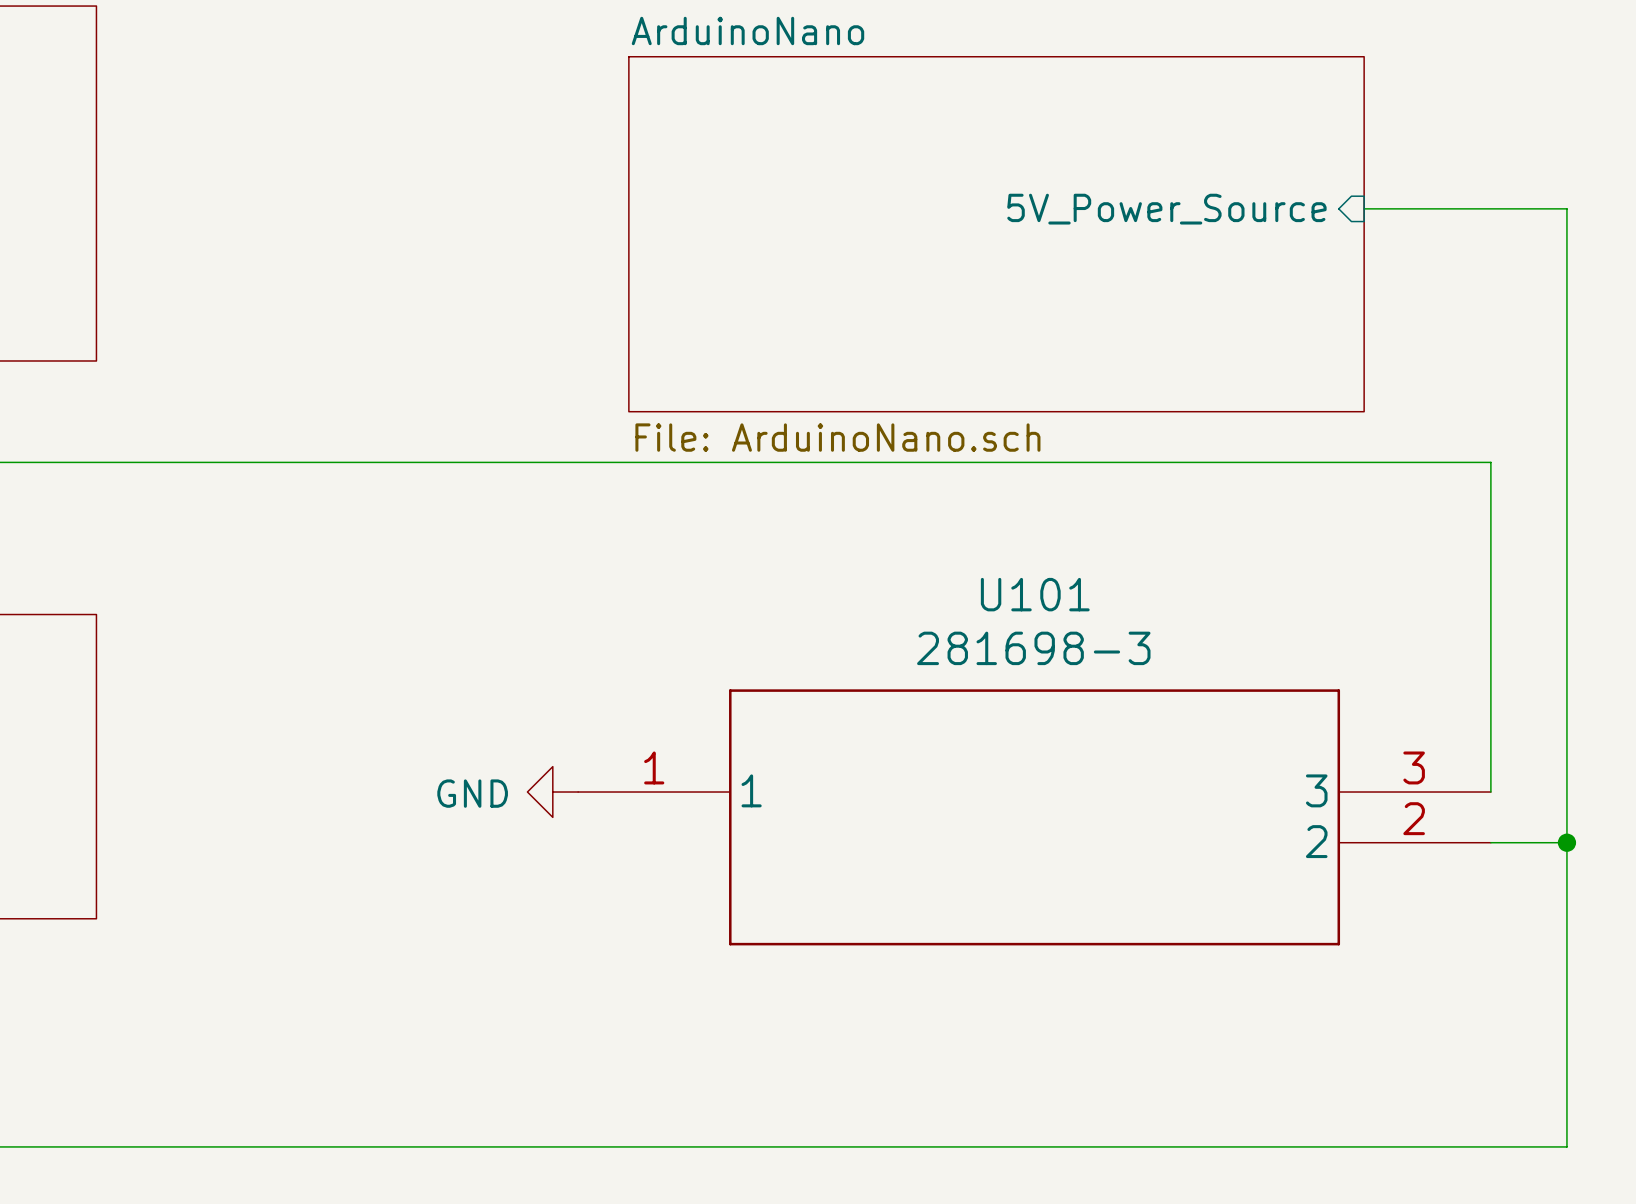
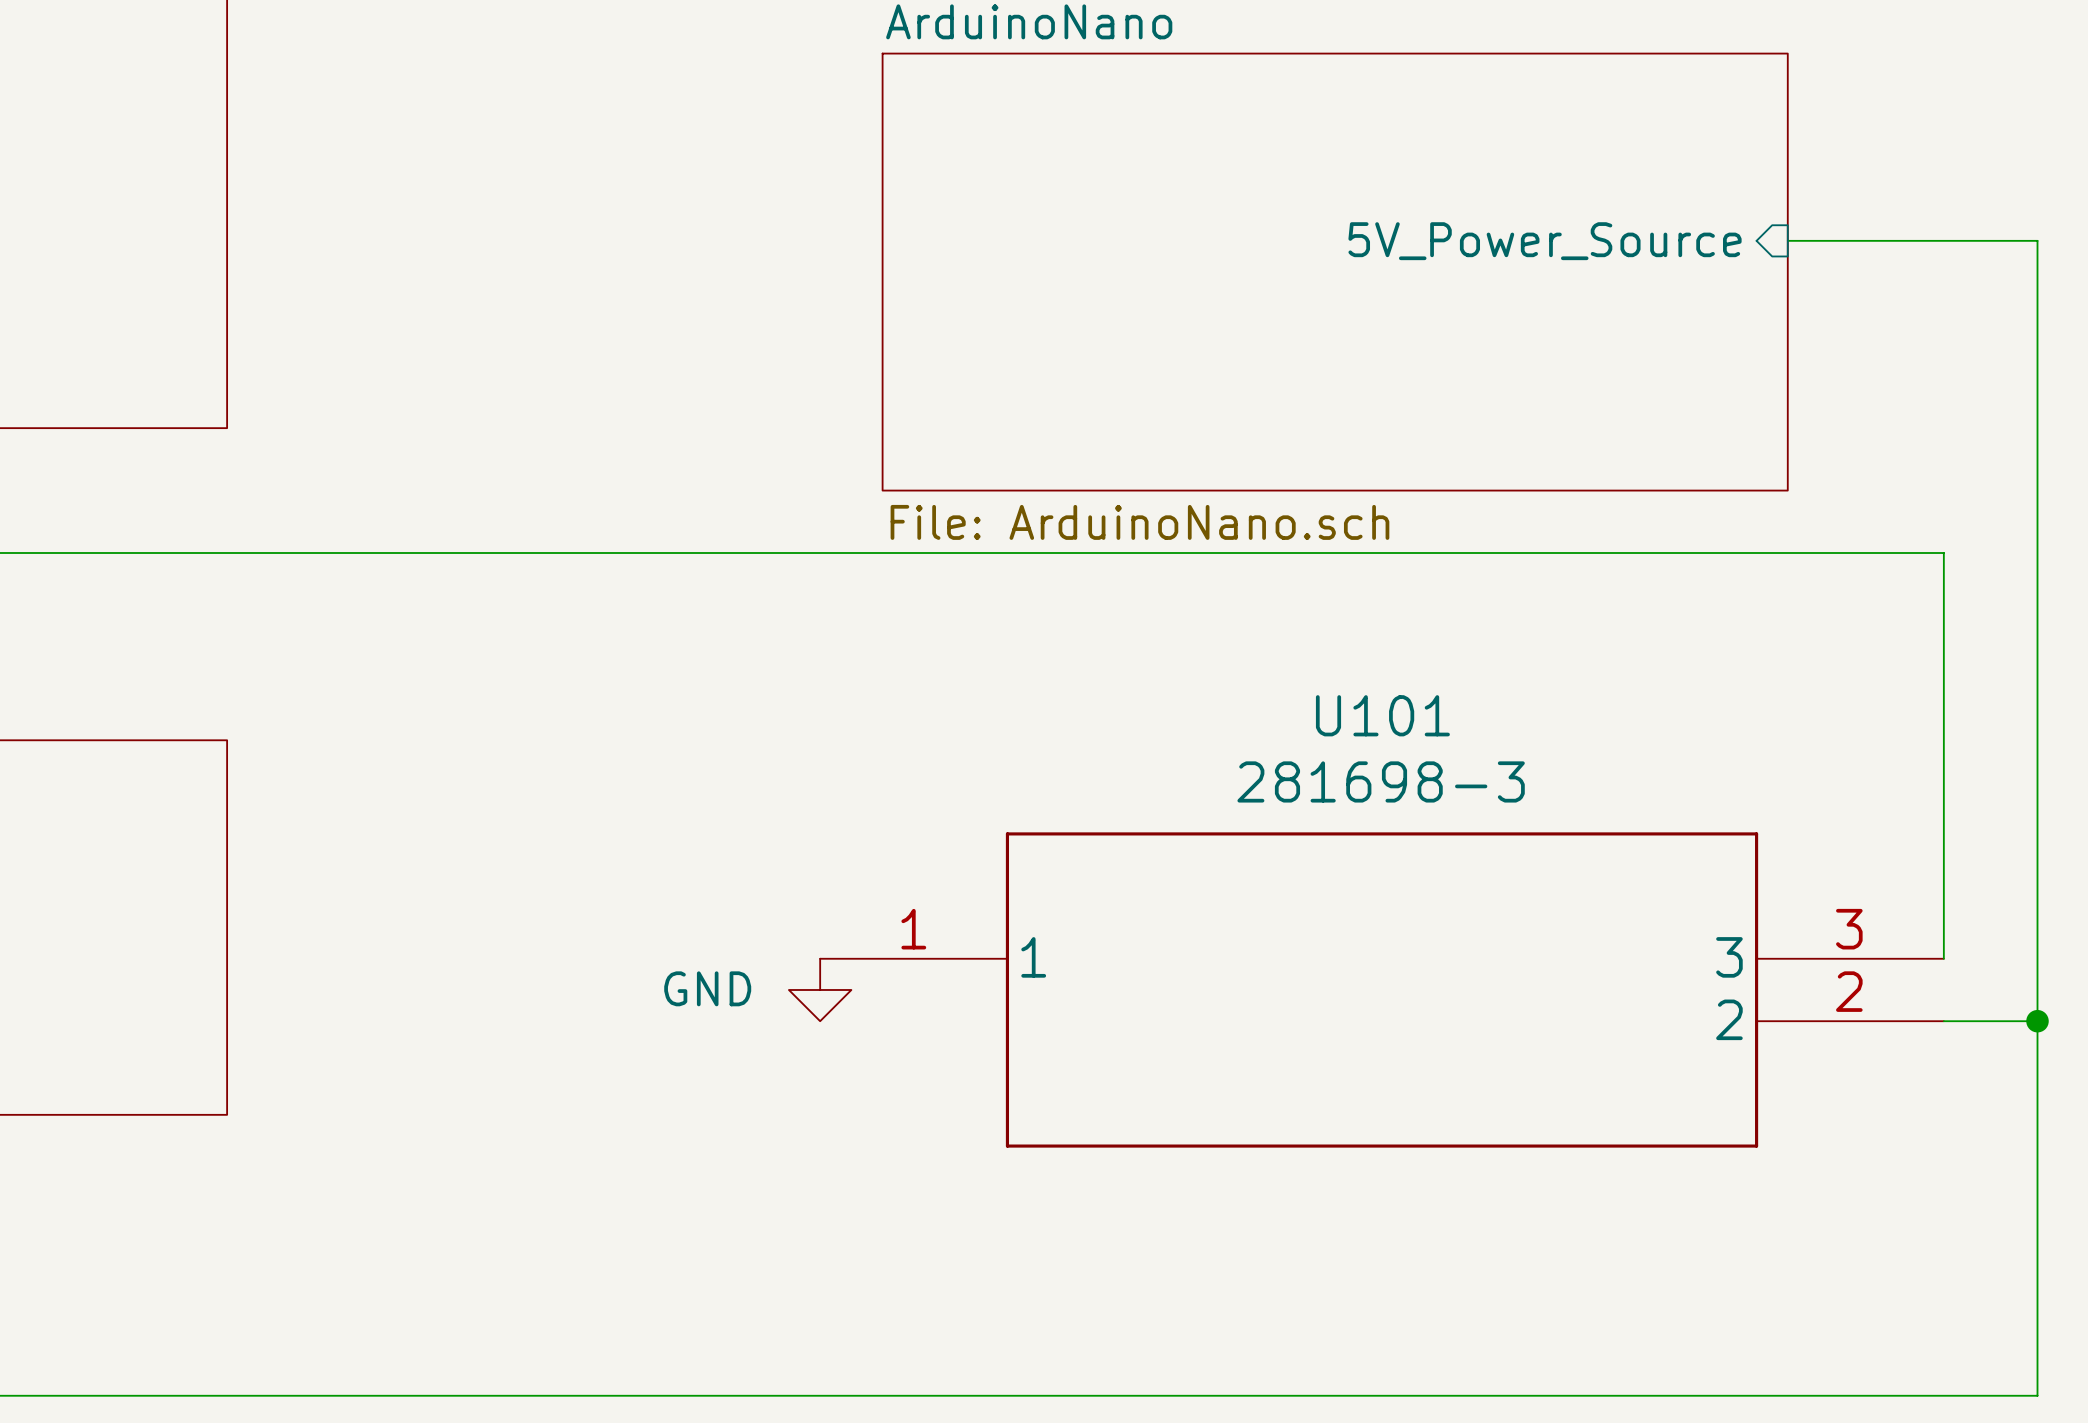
power symbol rotation: 0° (552, 792) -> 90° counterclockwise (820, 989)
power symbol position: GND (552, 792) -> GND (820, 989)

